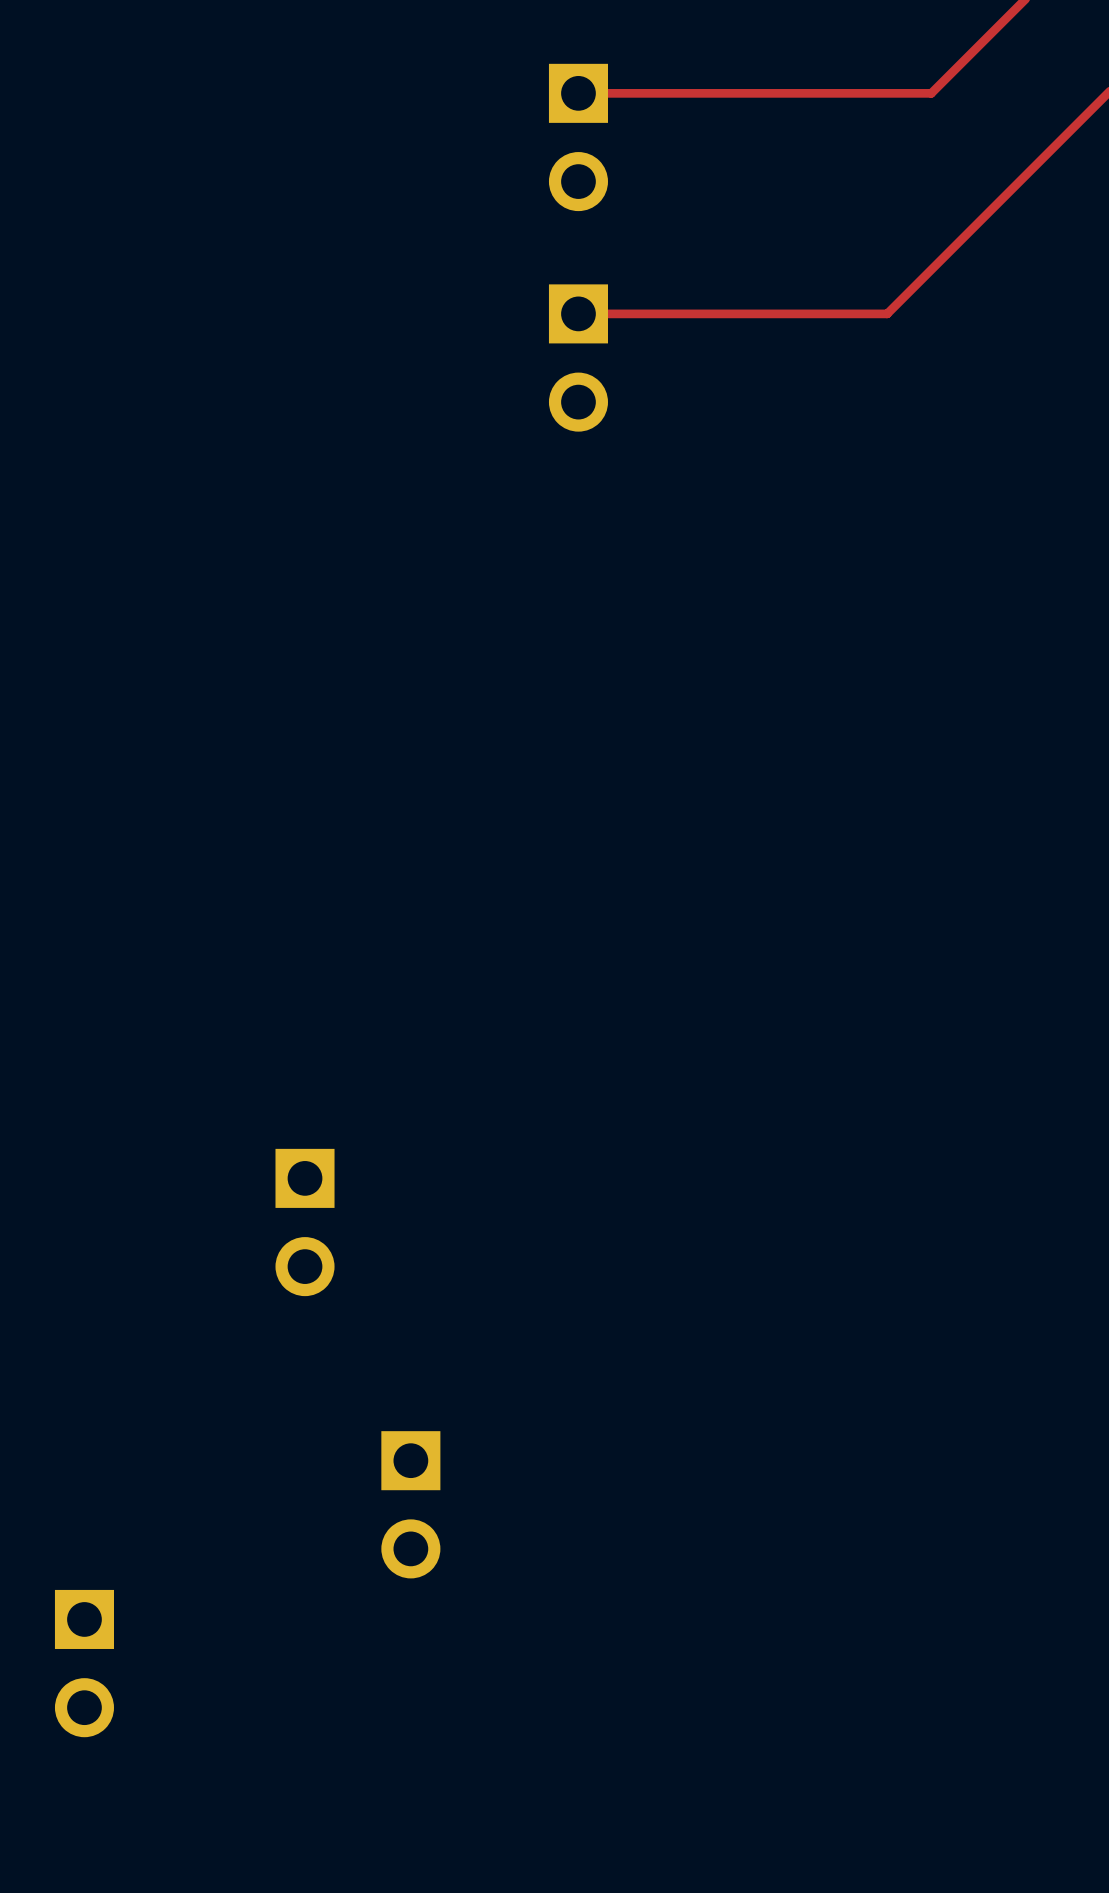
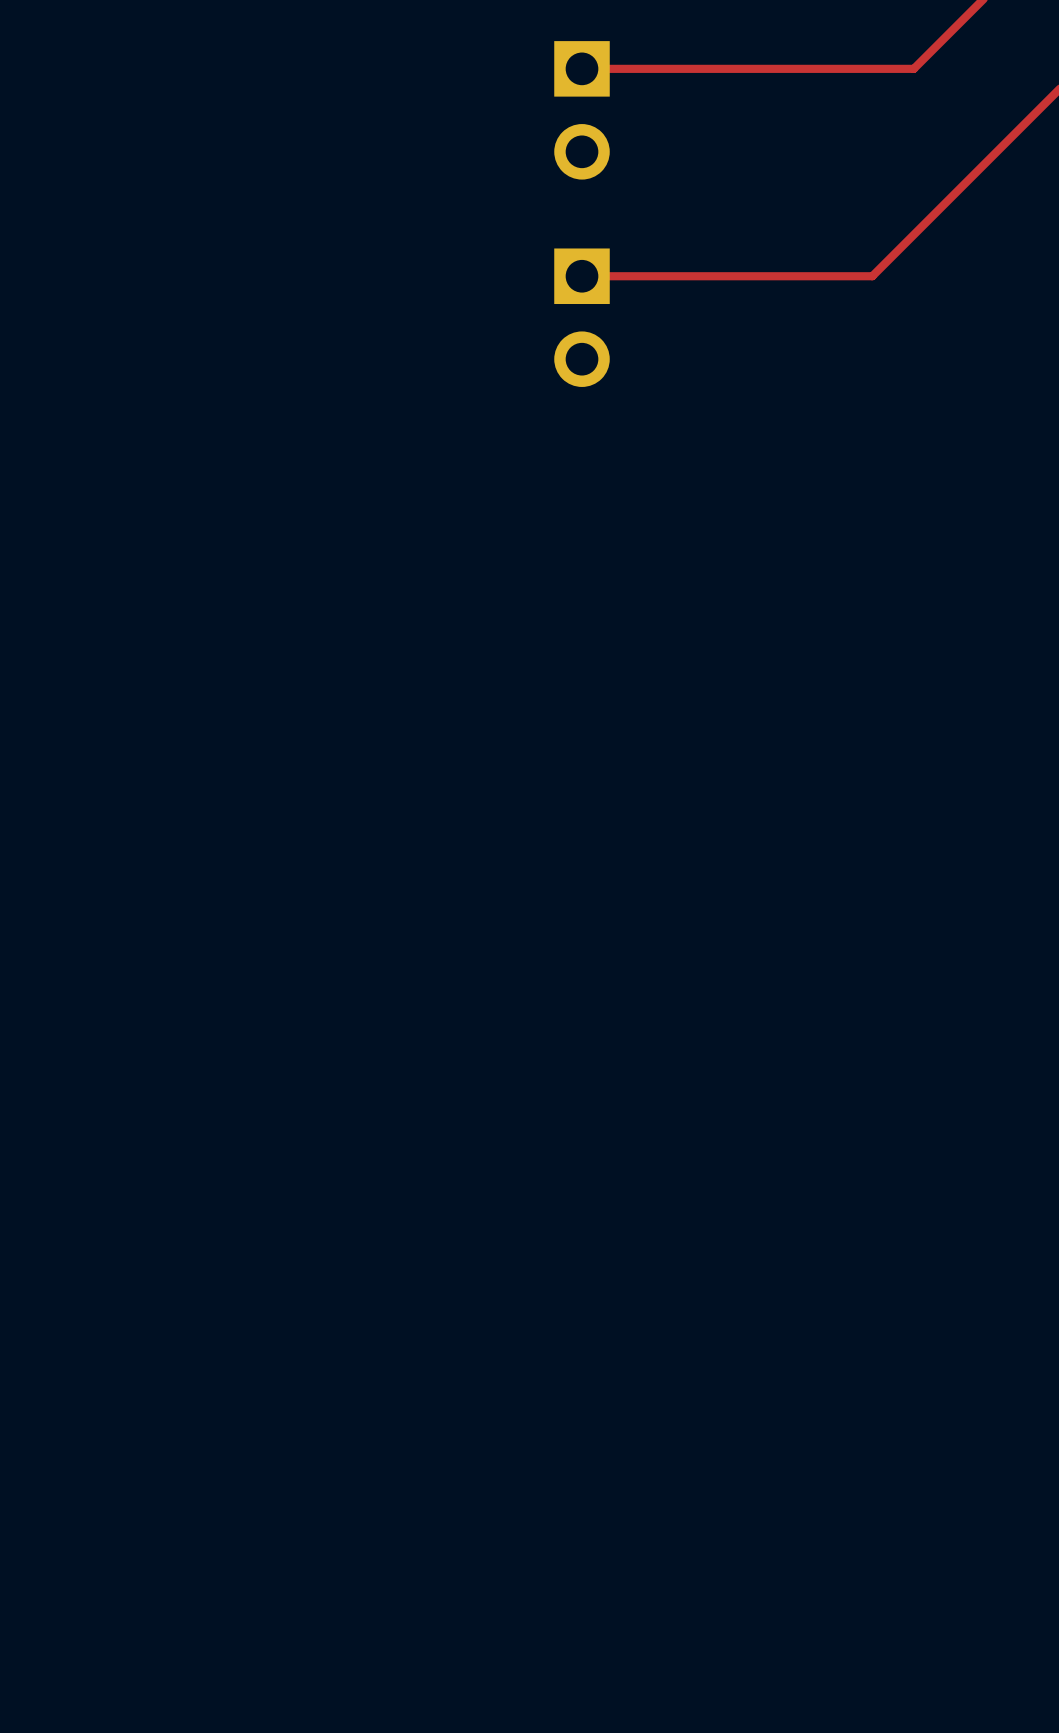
part: (305, 1222) -> none
part: (410, 1504) -> none
part: (84, 1663) -> none

